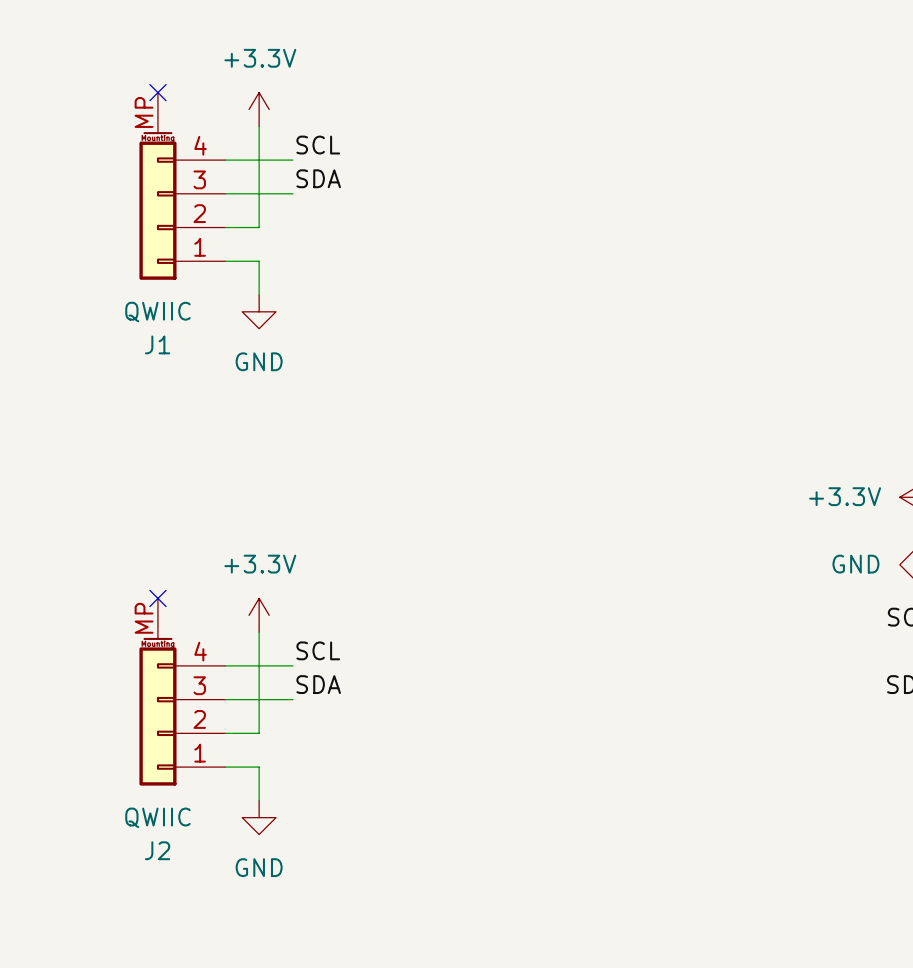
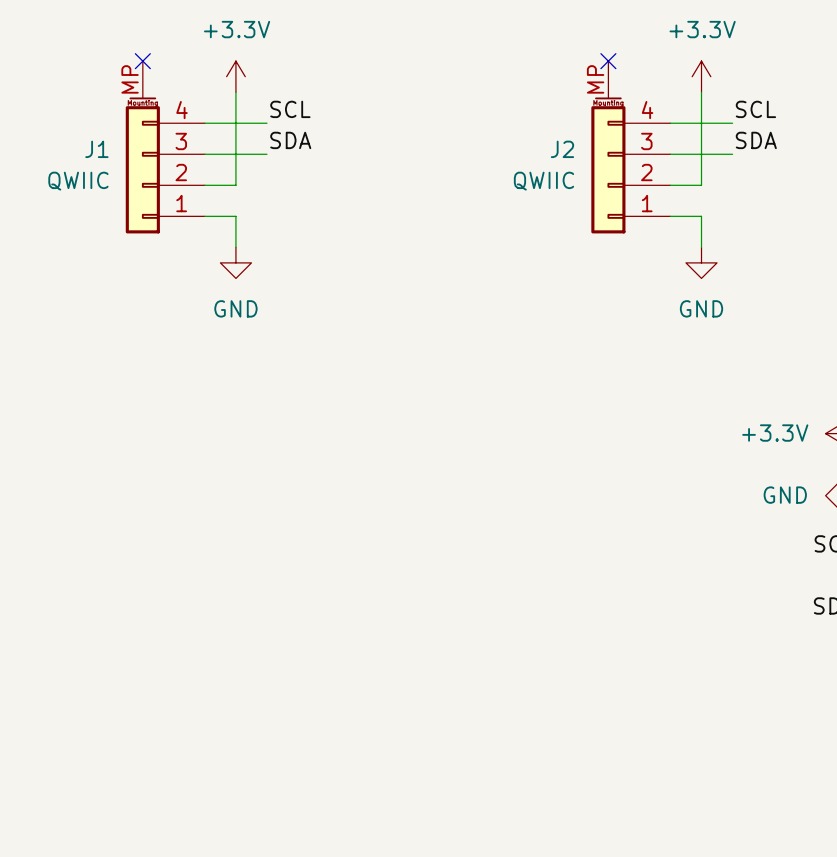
no-connect mark: none -> (608, 61)
power symbol: none -> +3.3V (701, 76)
wire: none -> (701, 92) (701, 185) (670, 185)
label: none -> SCL (755, 109)
wire: none -> (670, 123) (732, 123)
label: none -> SDA (756, 140)
wire: none -> (670, 154) (732, 154)
wire: none -> (670, 216) (701, 216) (701, 247)
power symbol: none -> GND (701, 262)
J1 value position: QWIIC (157, 312) -> QWIIC (78, 181)
J1 name position: J1 (157, 344) -> J1 (96, 149)
no-connect mark: (157, 598) -> none
power symbol: +3.3V (259, 615) -> none
wire: (259, 632) (259, 733) (225, 733) -> none
label: SCL (318, 650) -> none
wire: (225, 665) (292, 665) -> none
label: SDA (318, 684) -> none
J2 position: (182, 692) -> (630, 147)
wire: (225, 699) (292, 699) -> none
wire: (225, 767) (259, 767) (259, 800) -> none
J2 value position: QWIIC (157, 817) -> QWIIC (543, 181)
power symbol: GND (259, 817) -> none
J2 name position: J2 (157, 850) -> J2 (562, 149)

